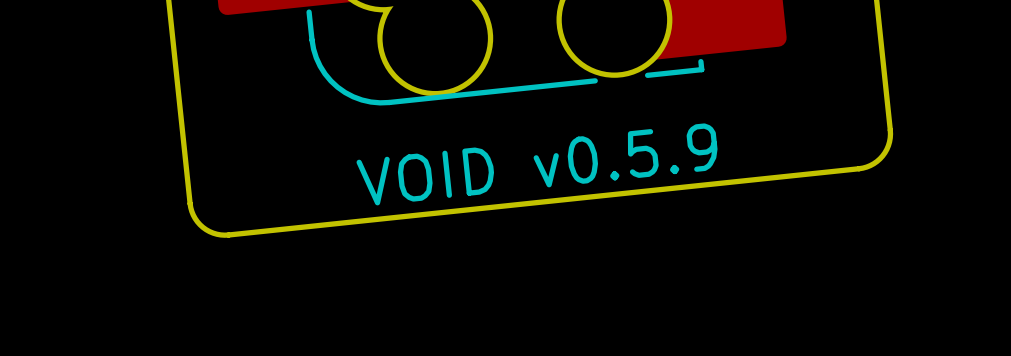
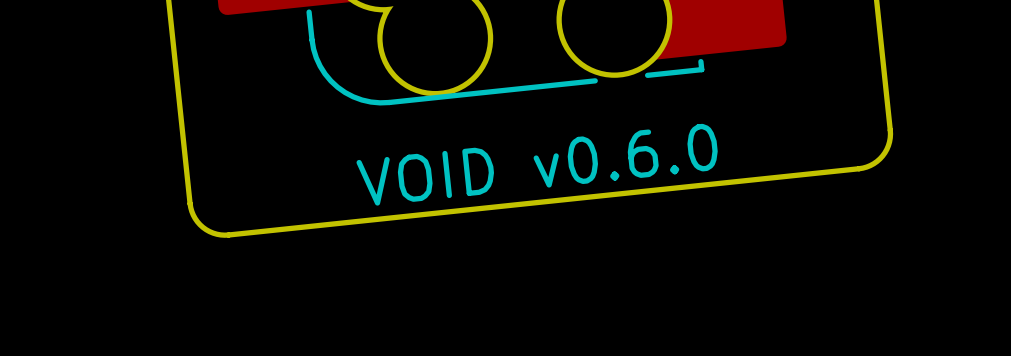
text: VOID v0.5.9 (537, 164) -> VOID v0.6.0 (537, 164)

